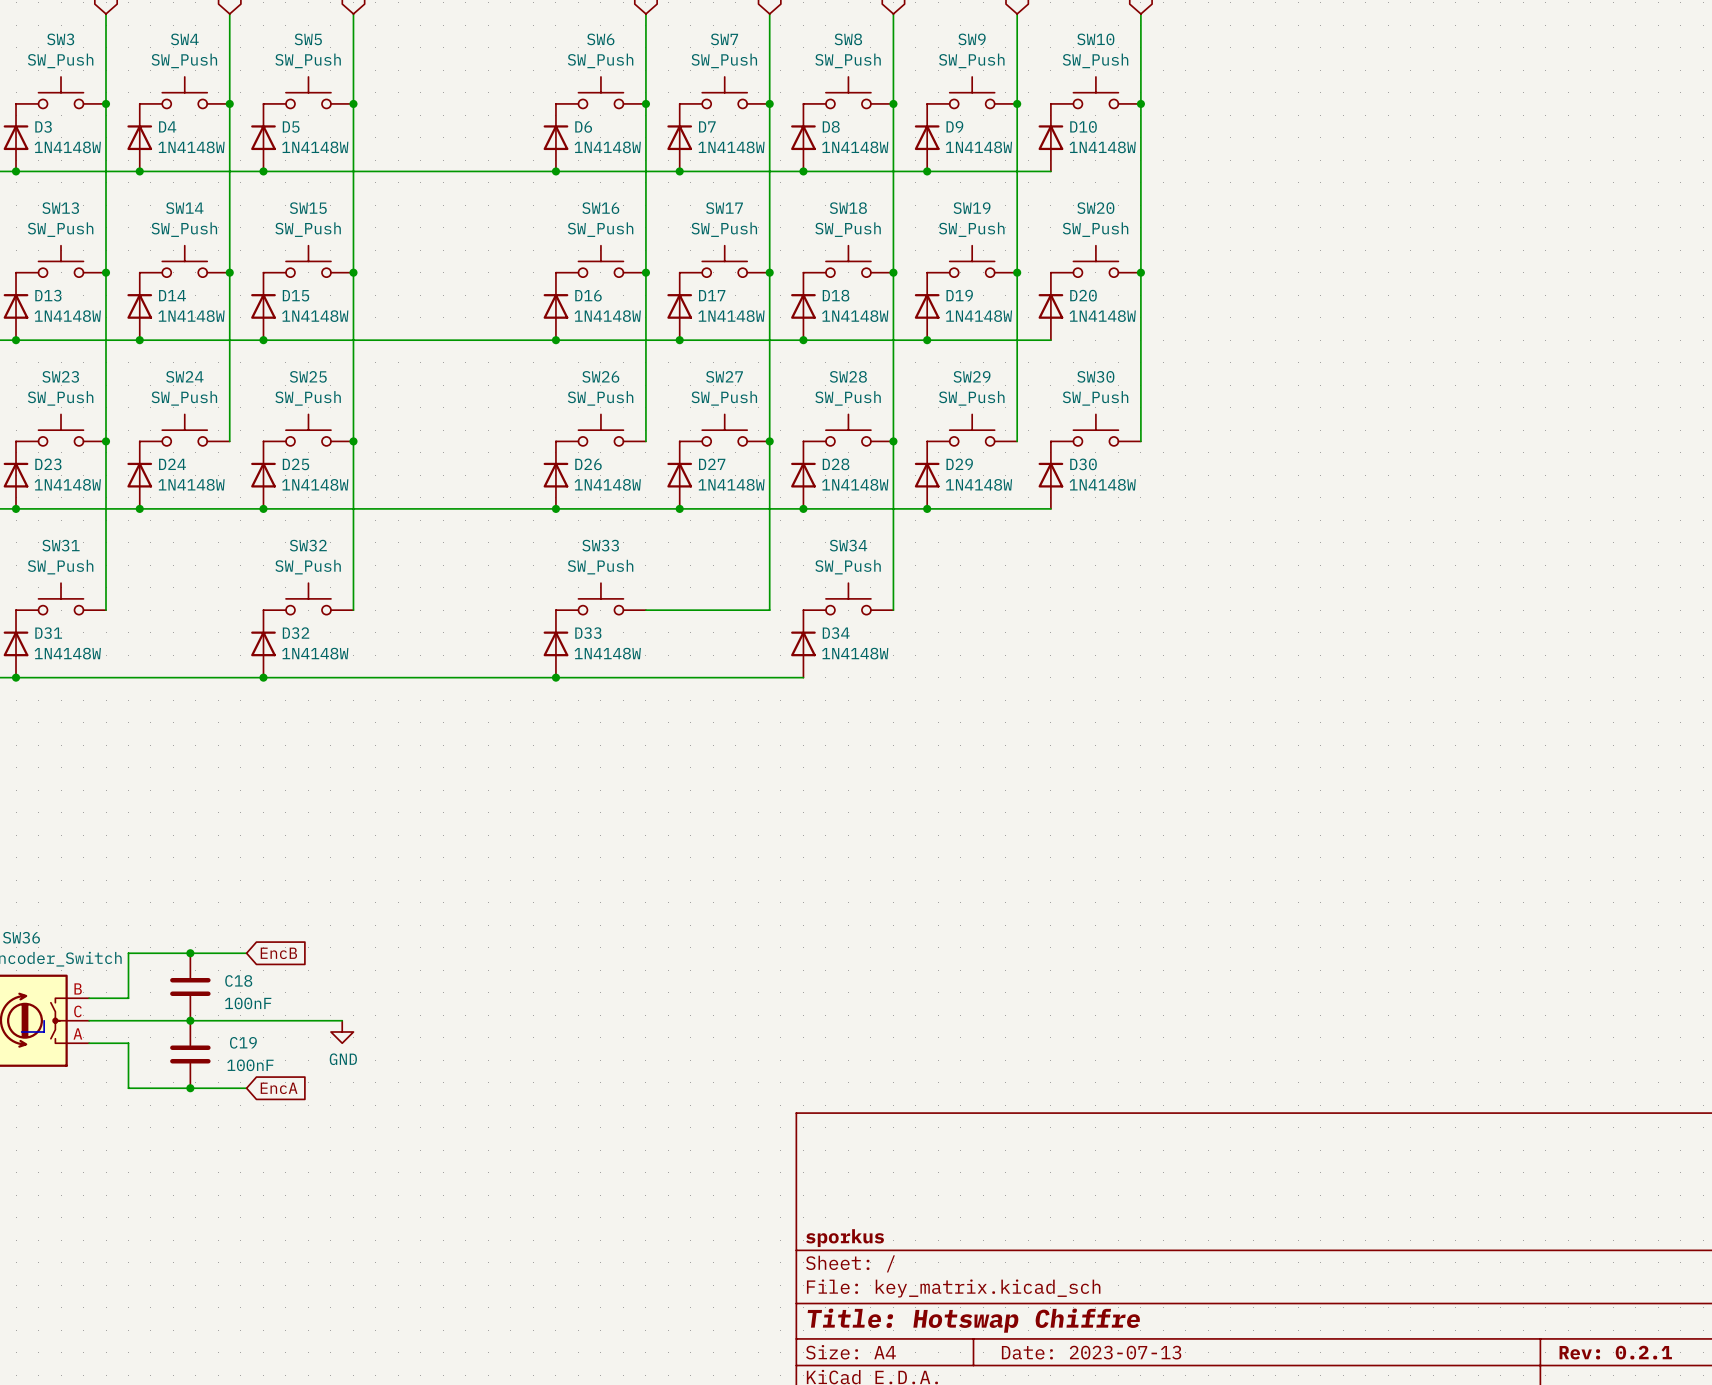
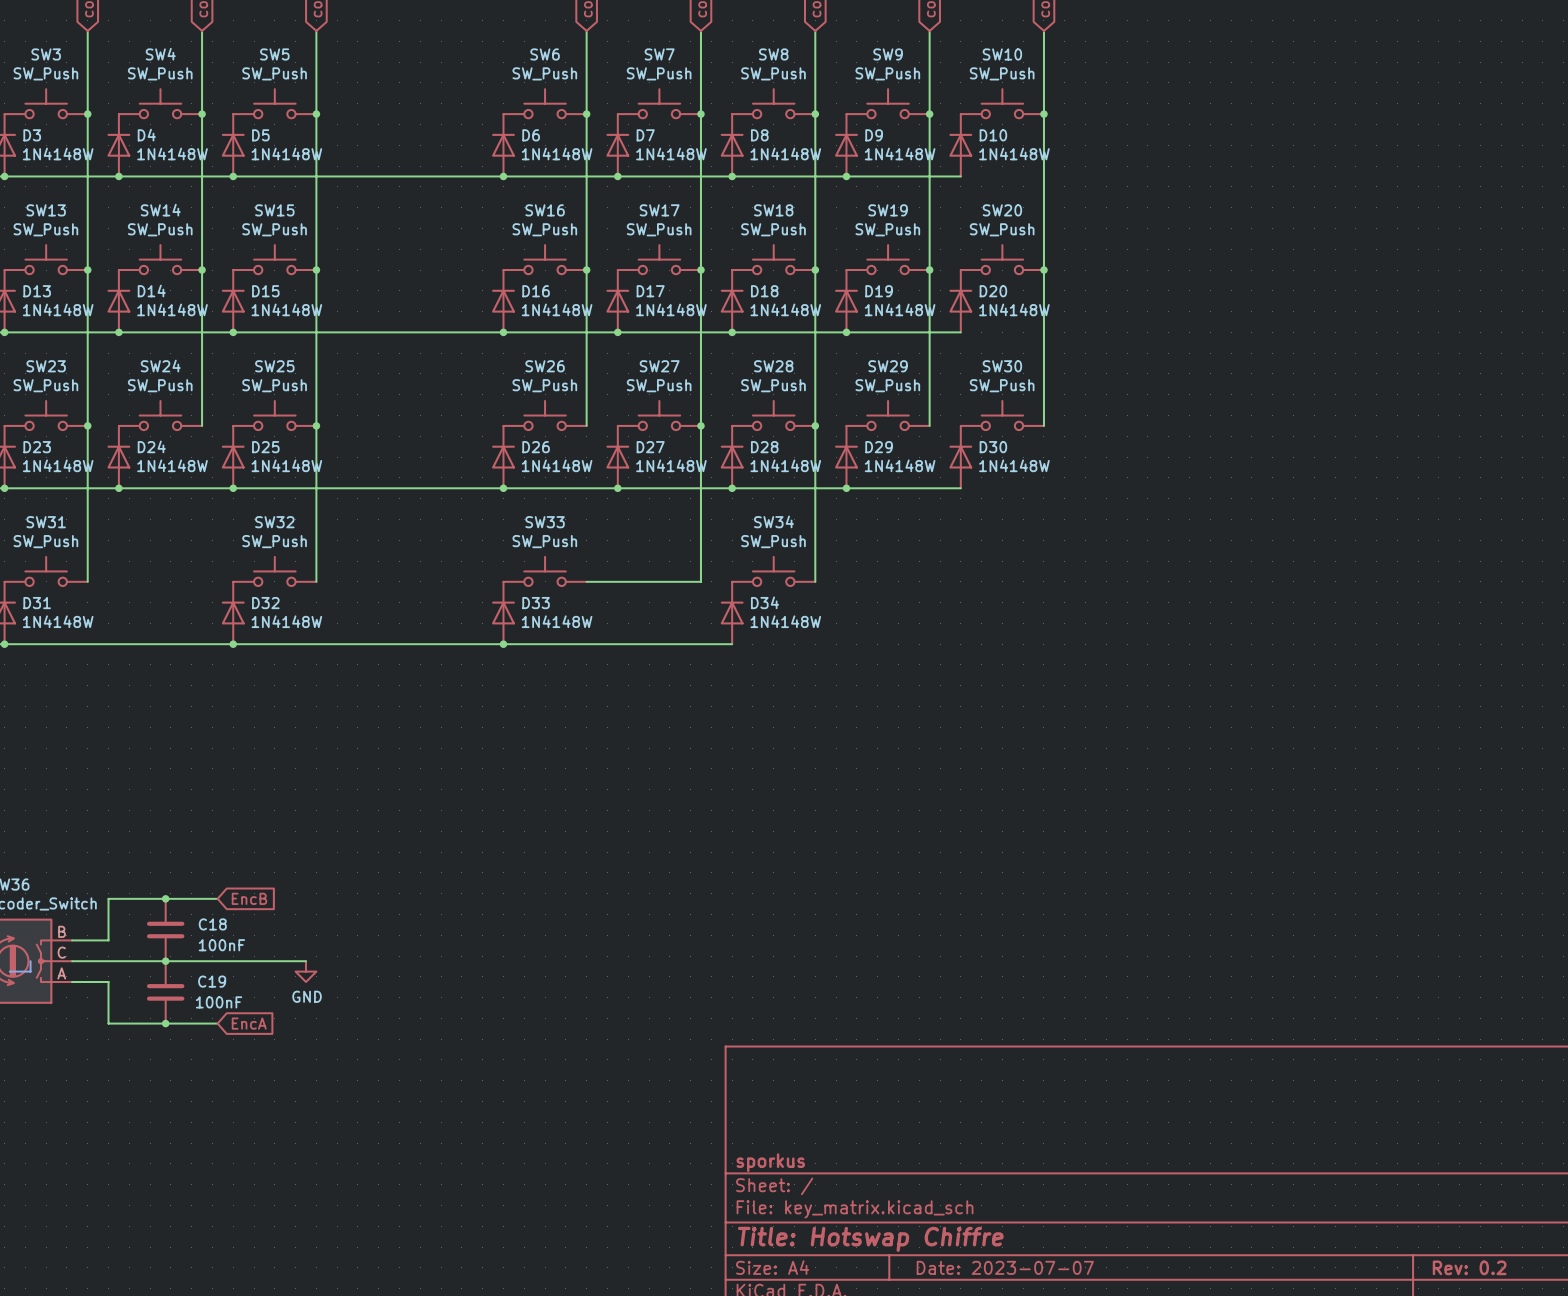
title block: Date: 2023-07-13 (1091, 1352) -> Date: 2023-07-07 (1005, 1267)
title block: Rev: 0.2.1 (1615, 1352) -> Rev: 0.2 (1469, 1267)

